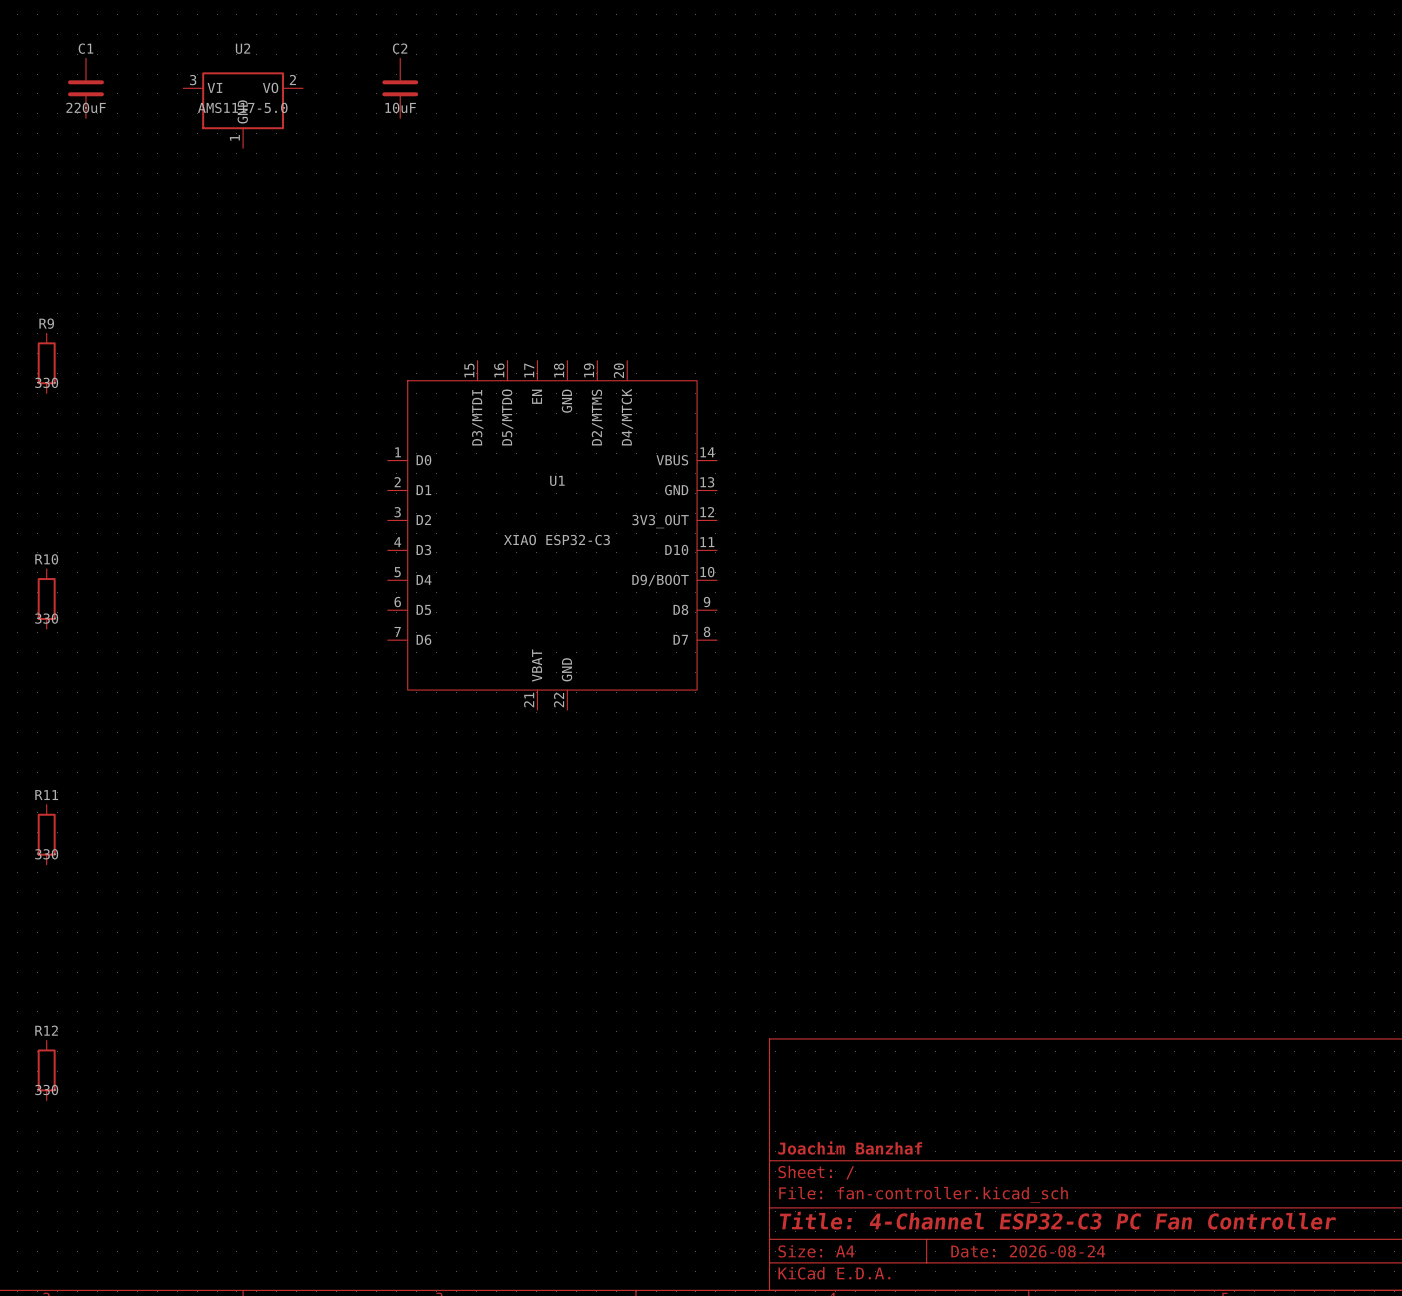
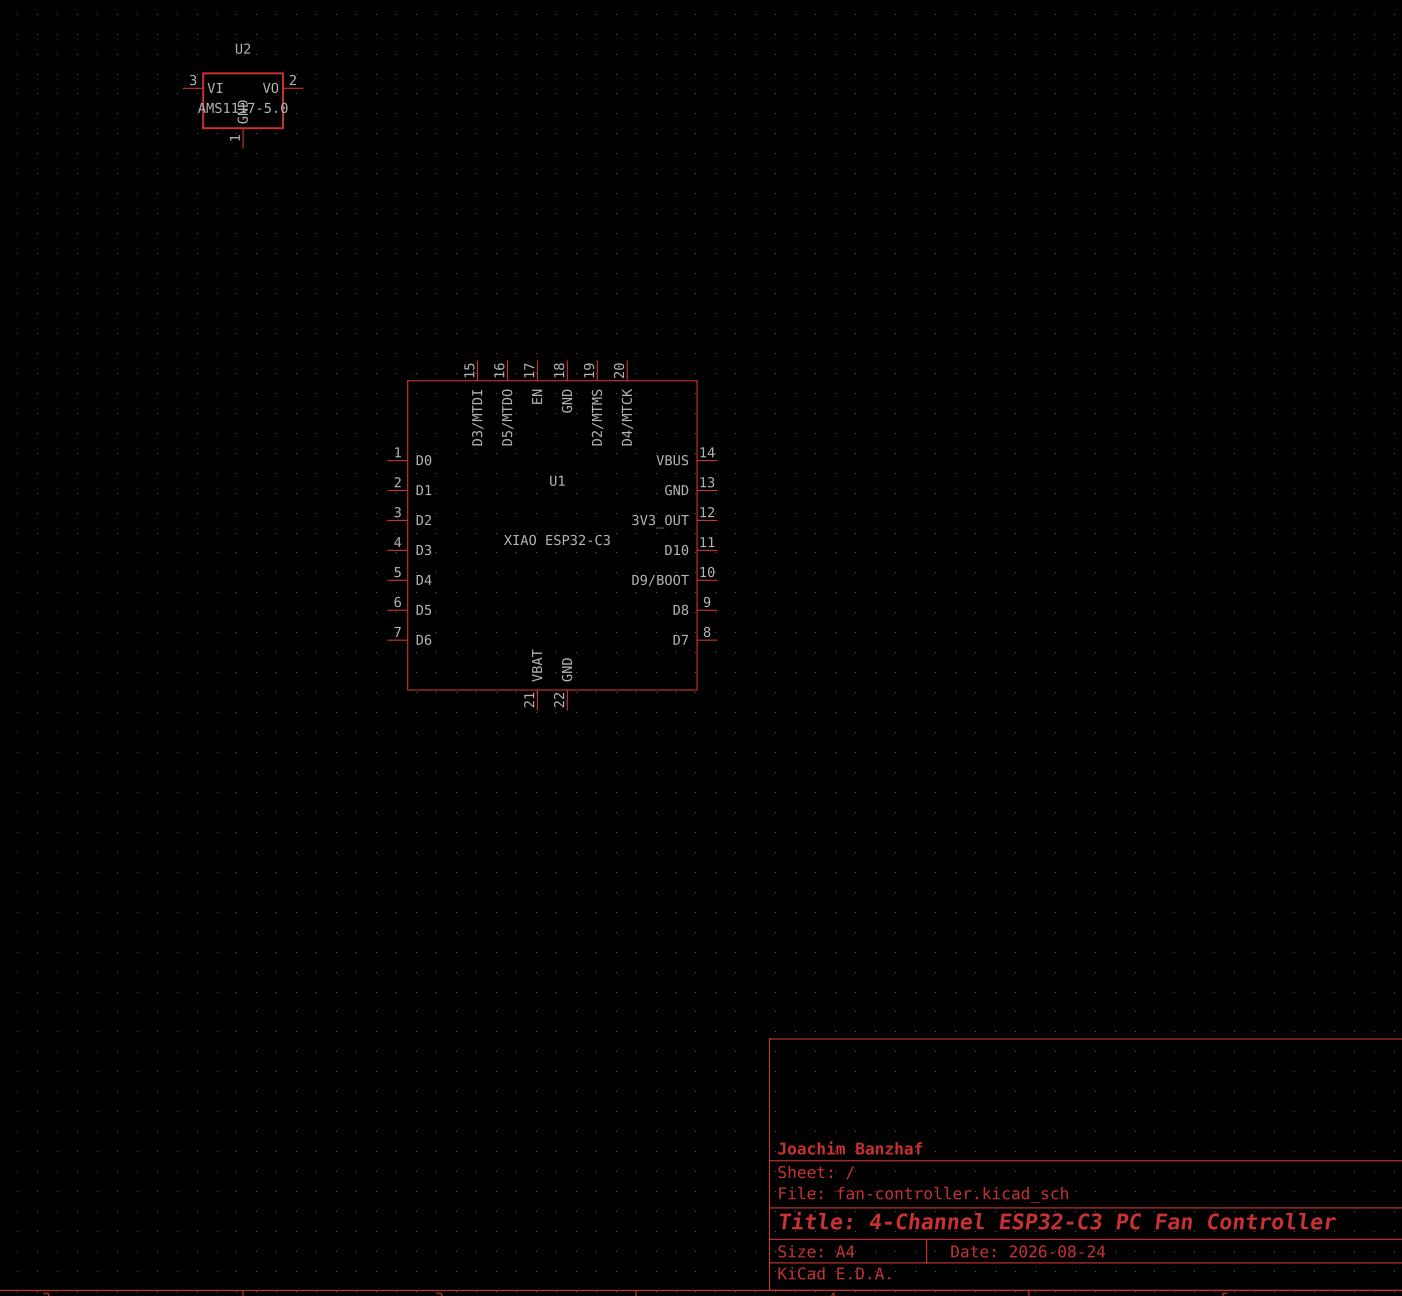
C1: 220uF (85, 88) -> none
C2: 10uF (400, 88) -> none
R9: 330 (46, 363) -> none
R10: 330 (46, 599) -> none
R11: 330 (46, 834) -> none
R12: 330 (46, 1070) -> none

